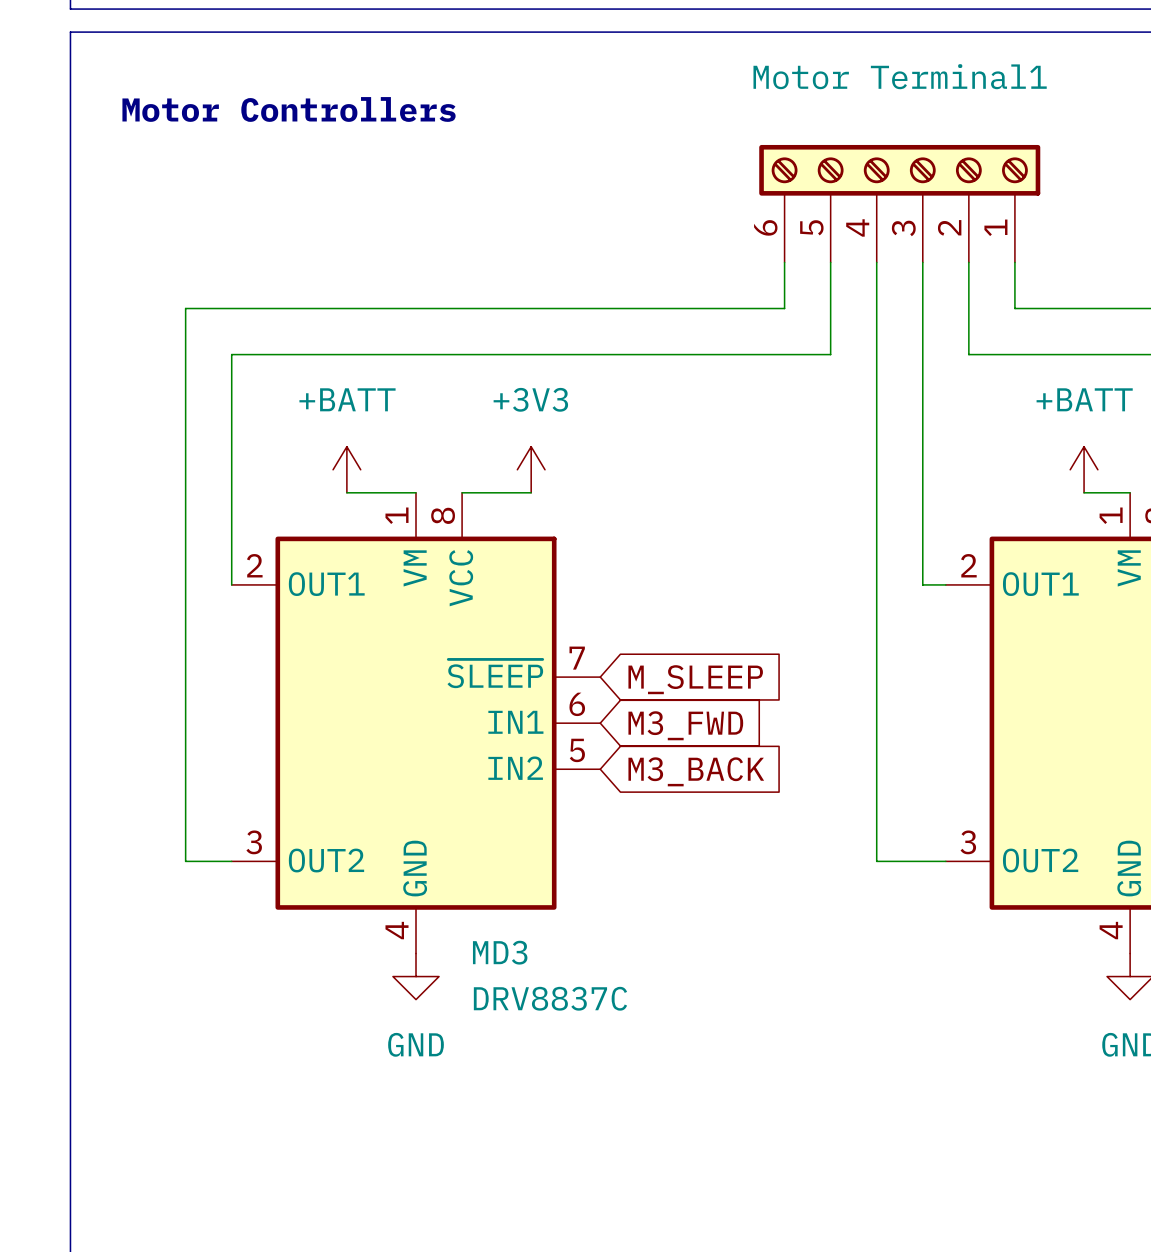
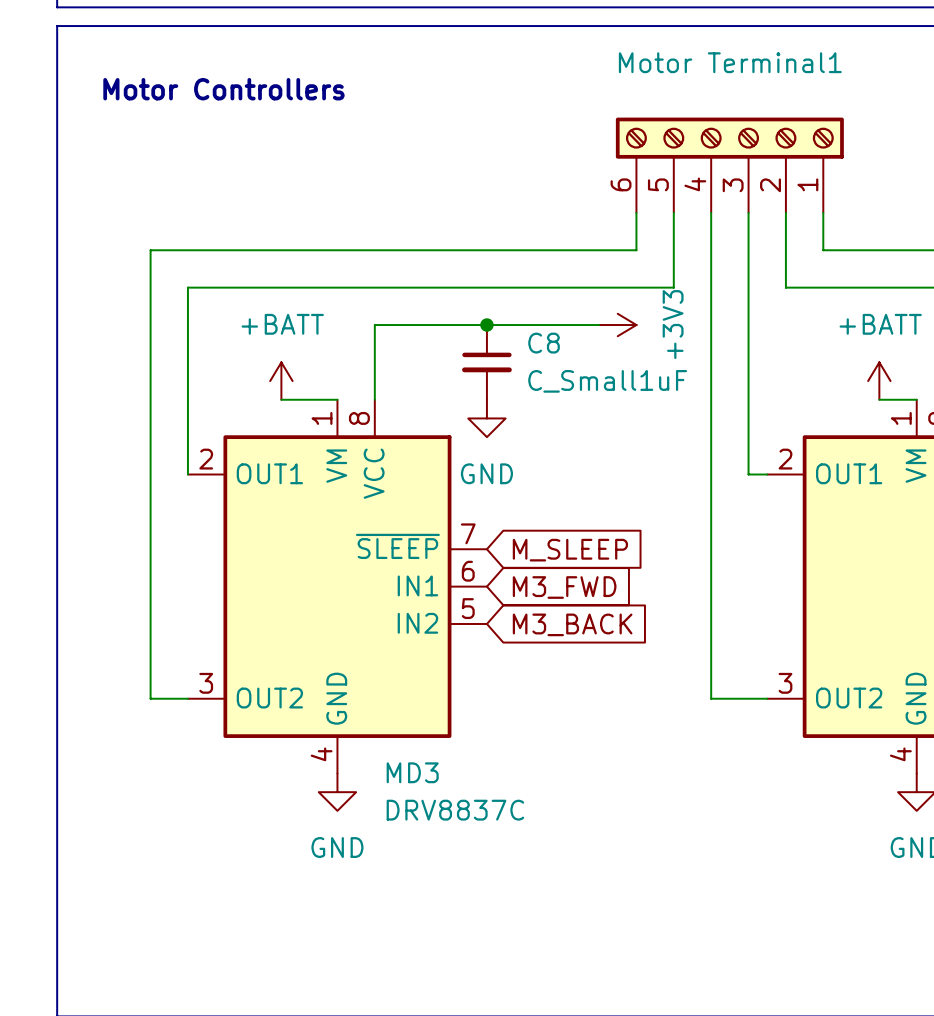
junction: none -> (486, 325)
power symbol: none -> +3V3 (617, 325)
C8: none -> C_Small1uF (486, 362)
power symbol: +3V3 (531, 469) -> none
wire: (462, 492) (531, 492) -> (374, 399) (374, 325) (599, 325)
power symbol: none -> GND (486, 418)

